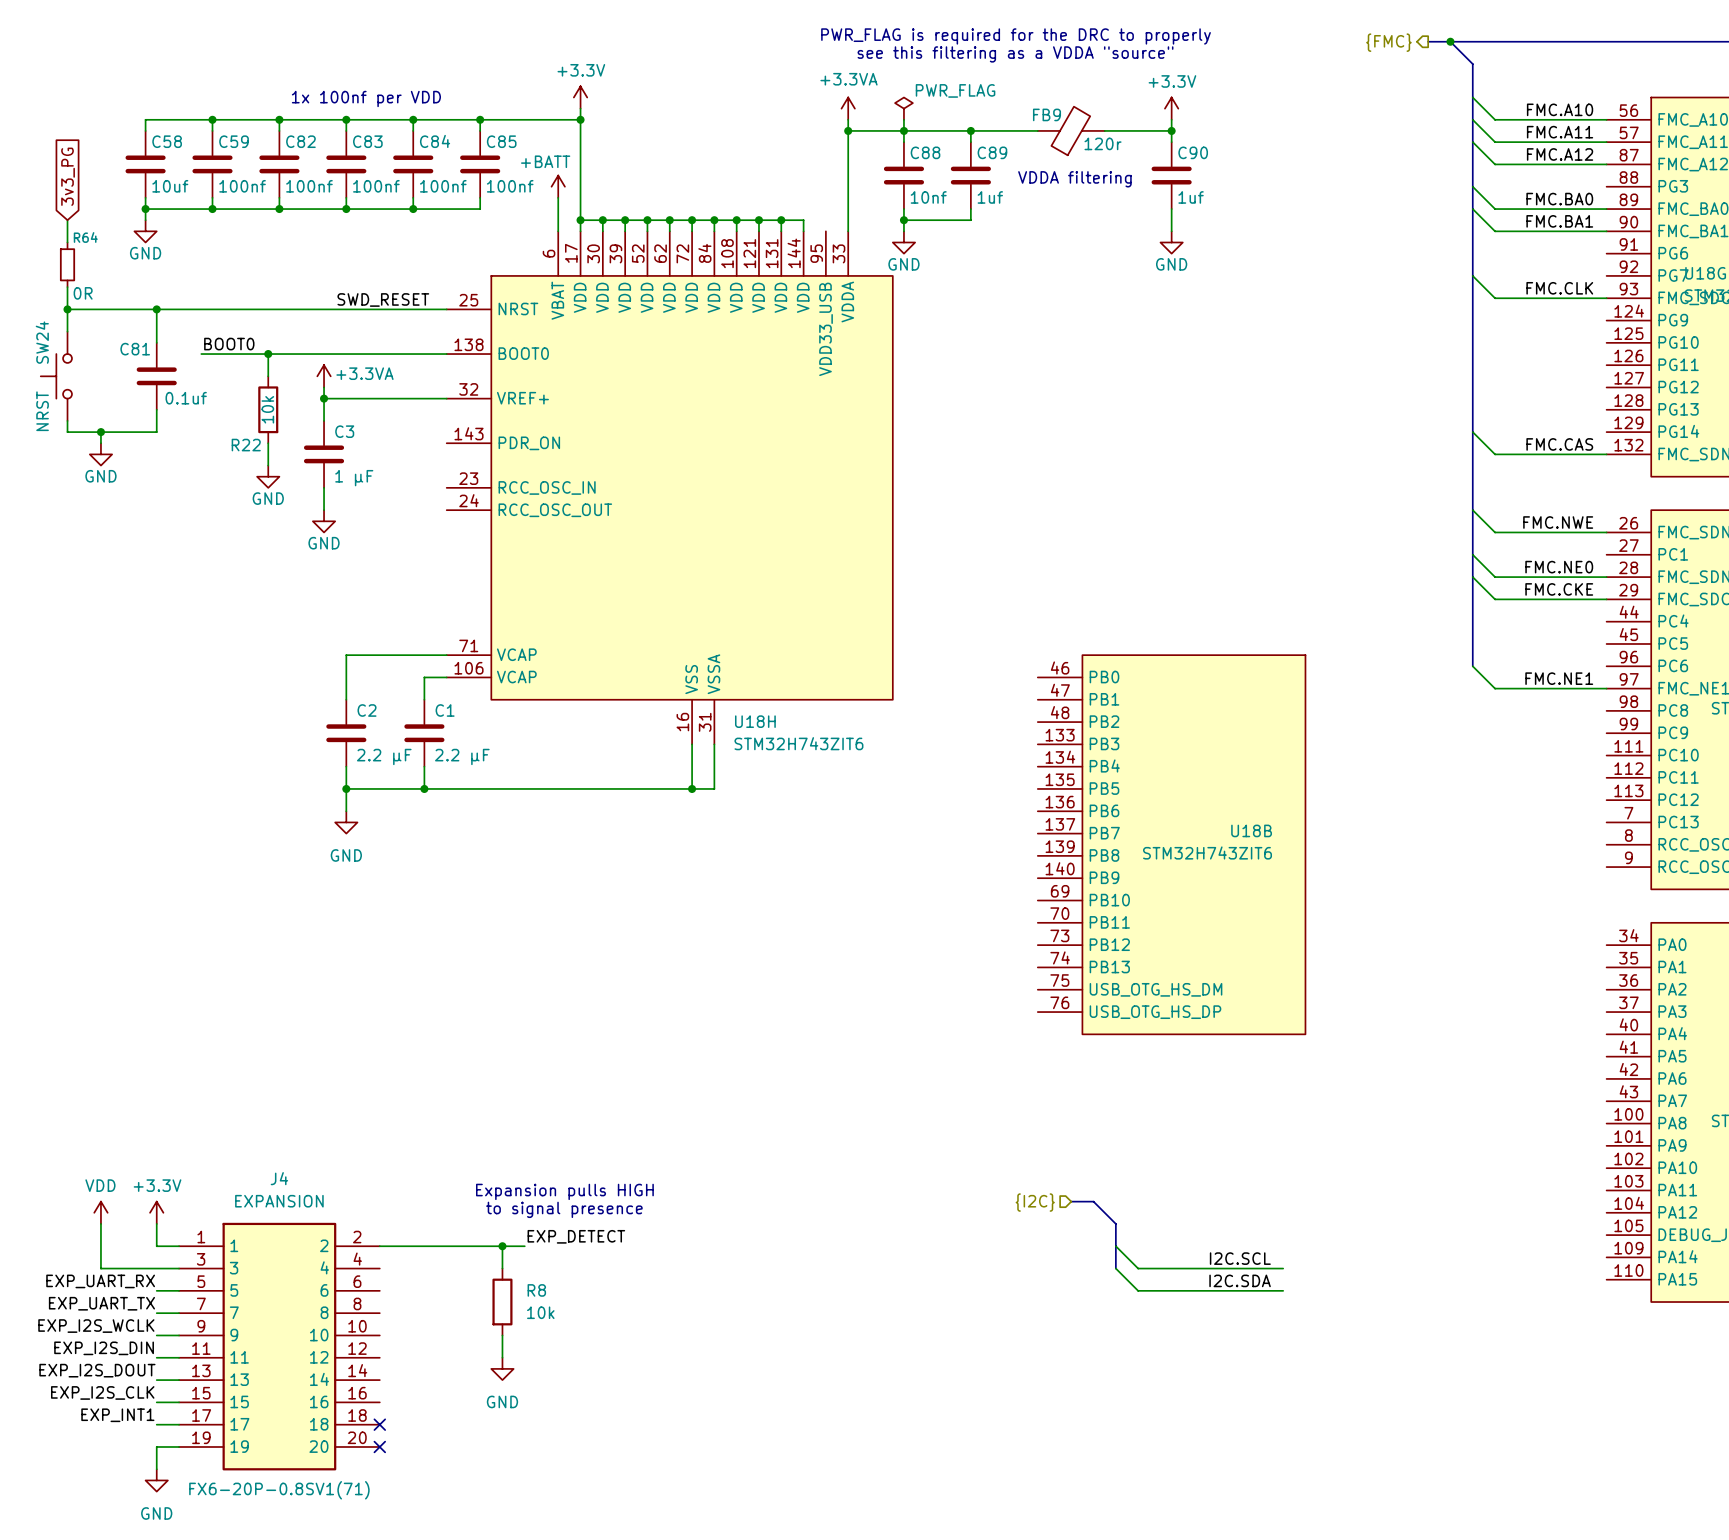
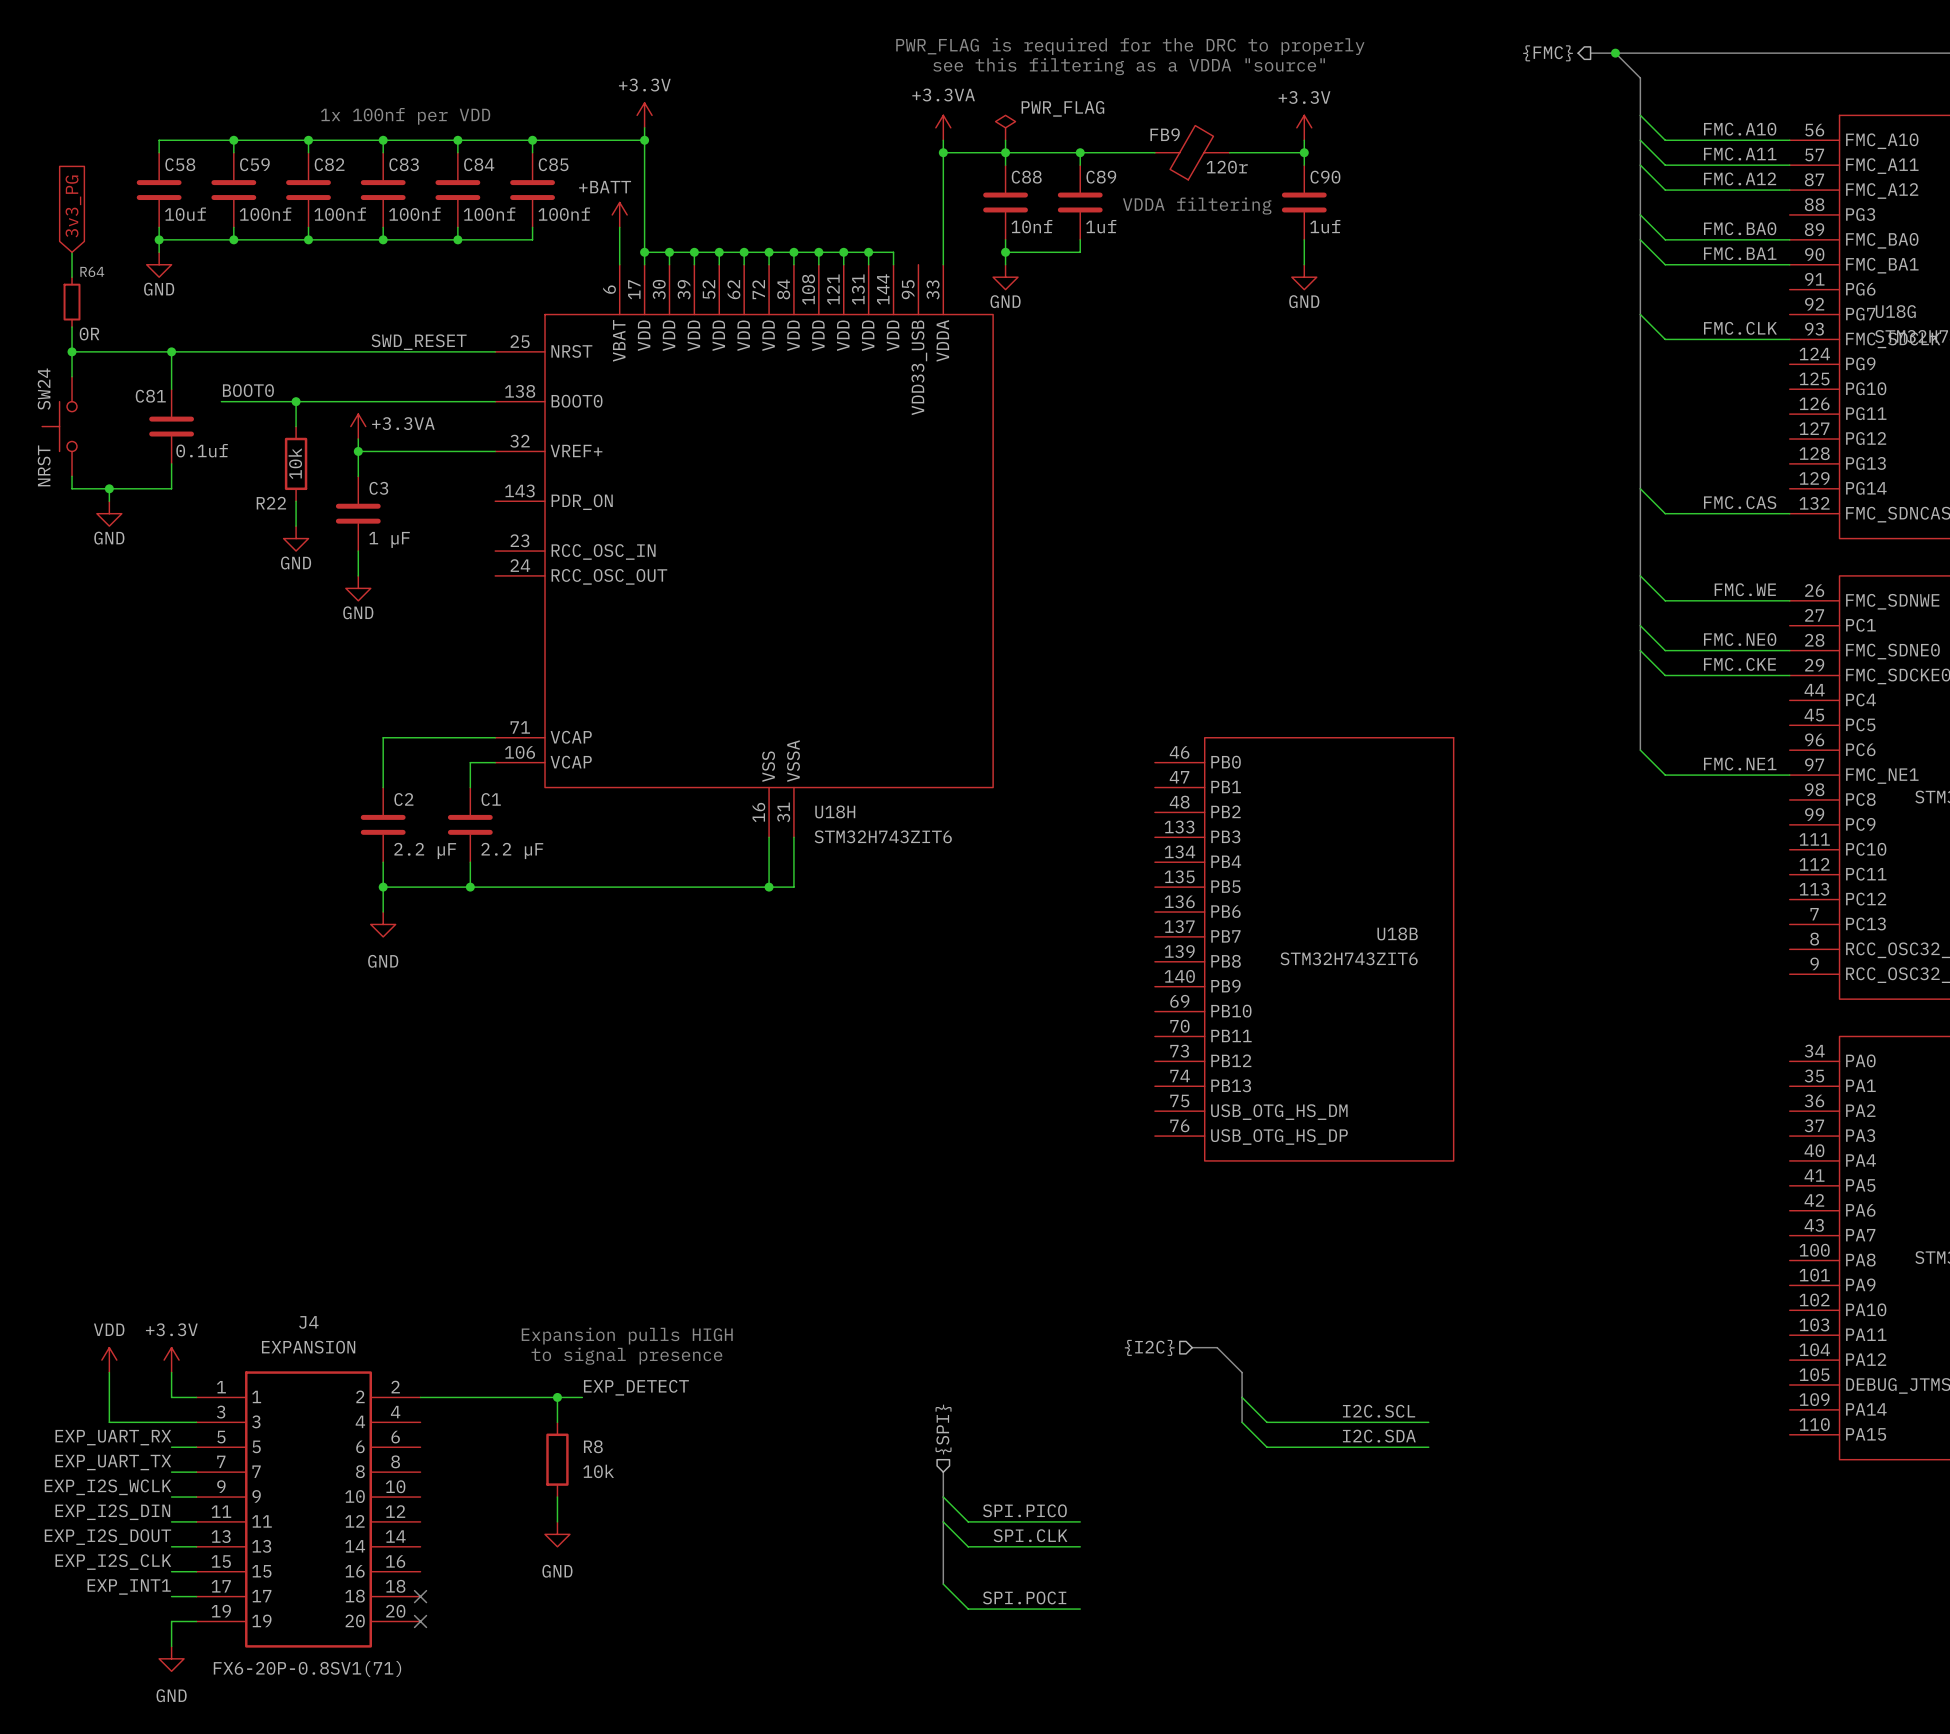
label: FMC.NWE (1558, 522) -> FMC.WE (1745, 589)
hierarchical label: none -> {SPI} (943, 1429)
bus: none -> (943, 1472) (943, 1584)
wire: none -> (943, 1497) (968, 1521) (1080, 1521)
label: none -> SPI.PICO (1024, 1510)
wire: none -> (943, 1521) (968, 1546) (1080, 1546)
label: none -> SPI.CLK (1030, 1535)
wire: none -> (943, 1584) (968, 1609) (1080, 1609)
label: none -> SPI.POCI (1024, 1597)

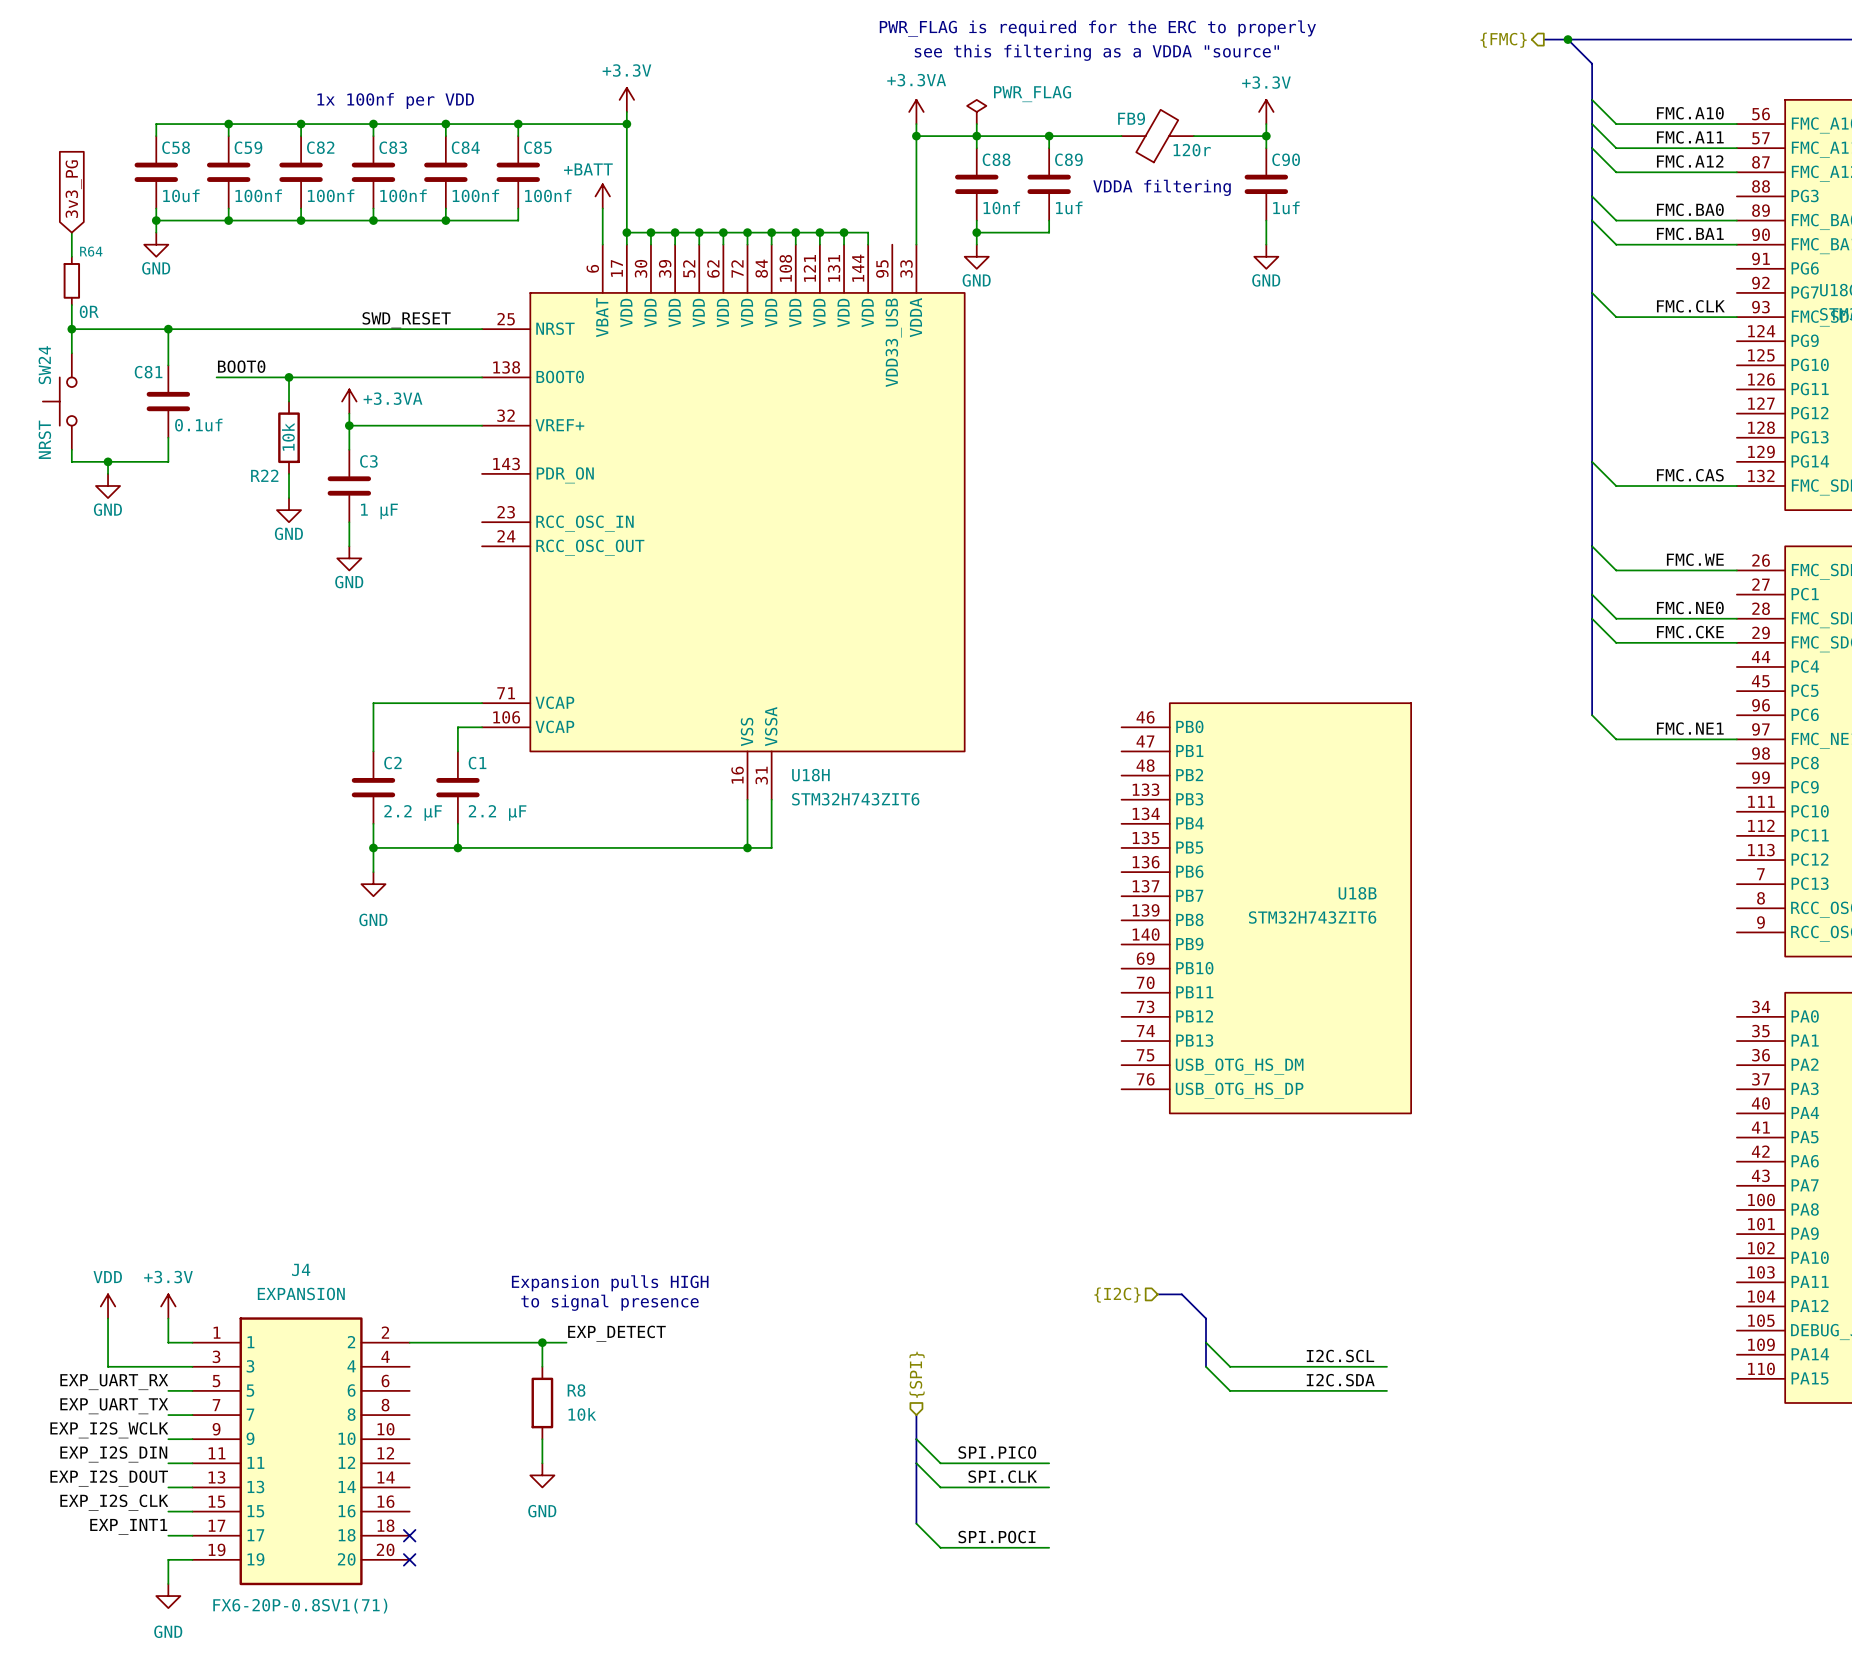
text: PWR_FLAG is required for the DRC to properly (1130, 46) -> PWR_FLAG is required for the ERC to properly (1097, 28)

